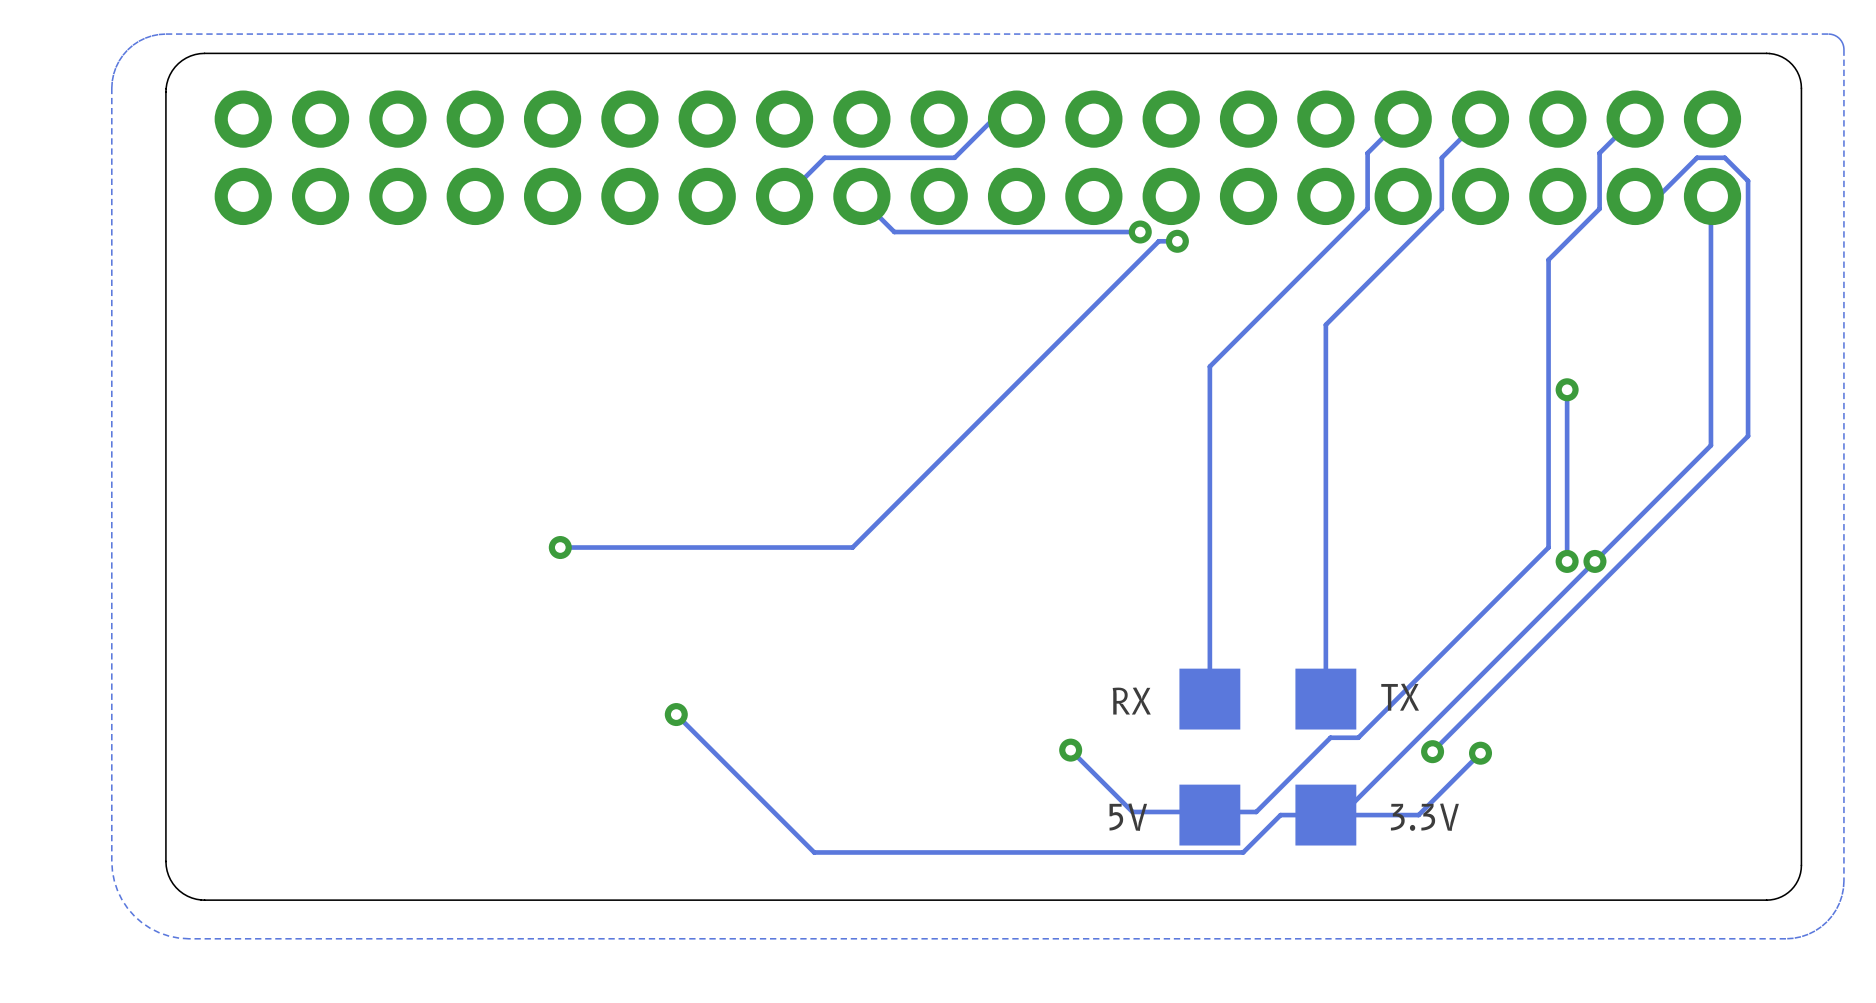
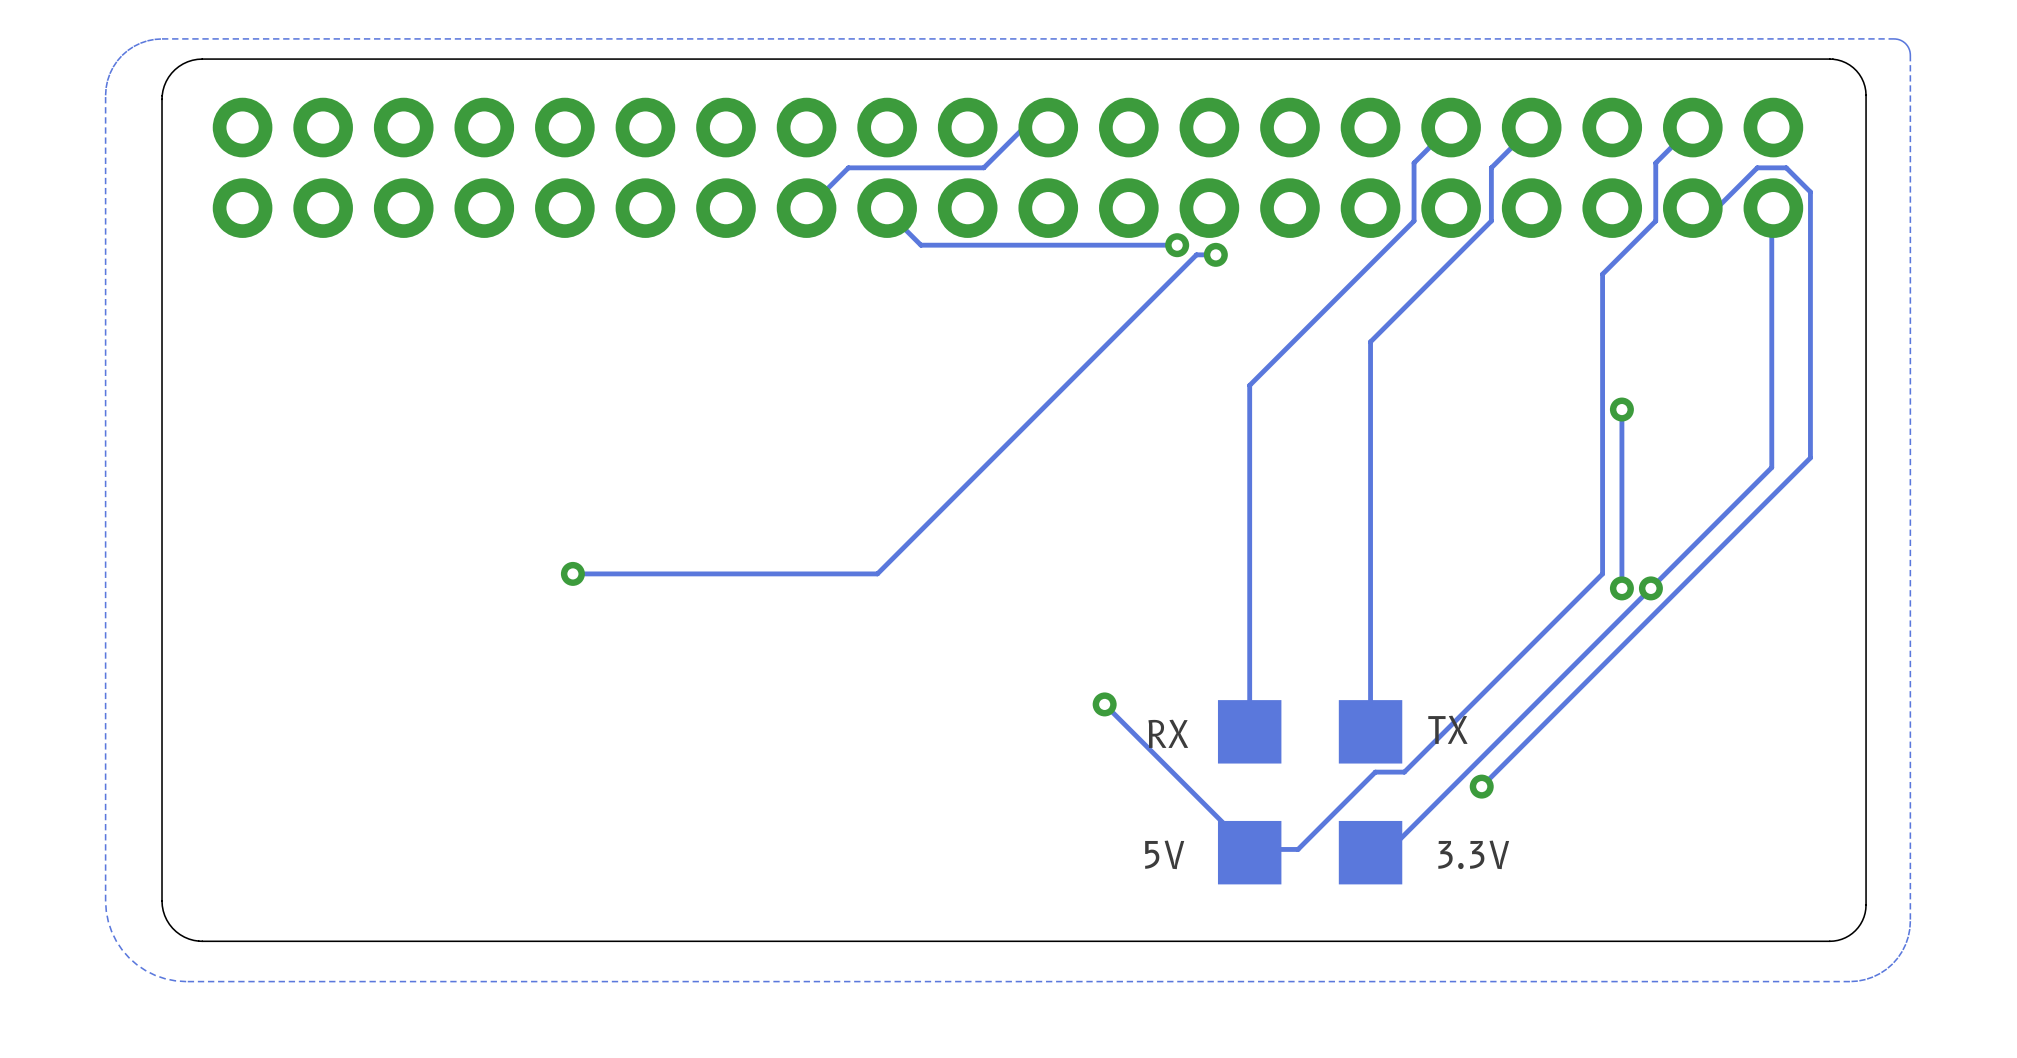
track: (676, 714) (814, 852) (1243, 852) (1280, 815) (1418, 815) (1480, 753) -> none
via: (676, 714) -> none
track: (1070, 750) (1132, 811) (1209, 811) -> (1104, 704) (1249, 849)
via position: (1070, 750) -> (1104, 704)
via: (1480, 753) -> none

